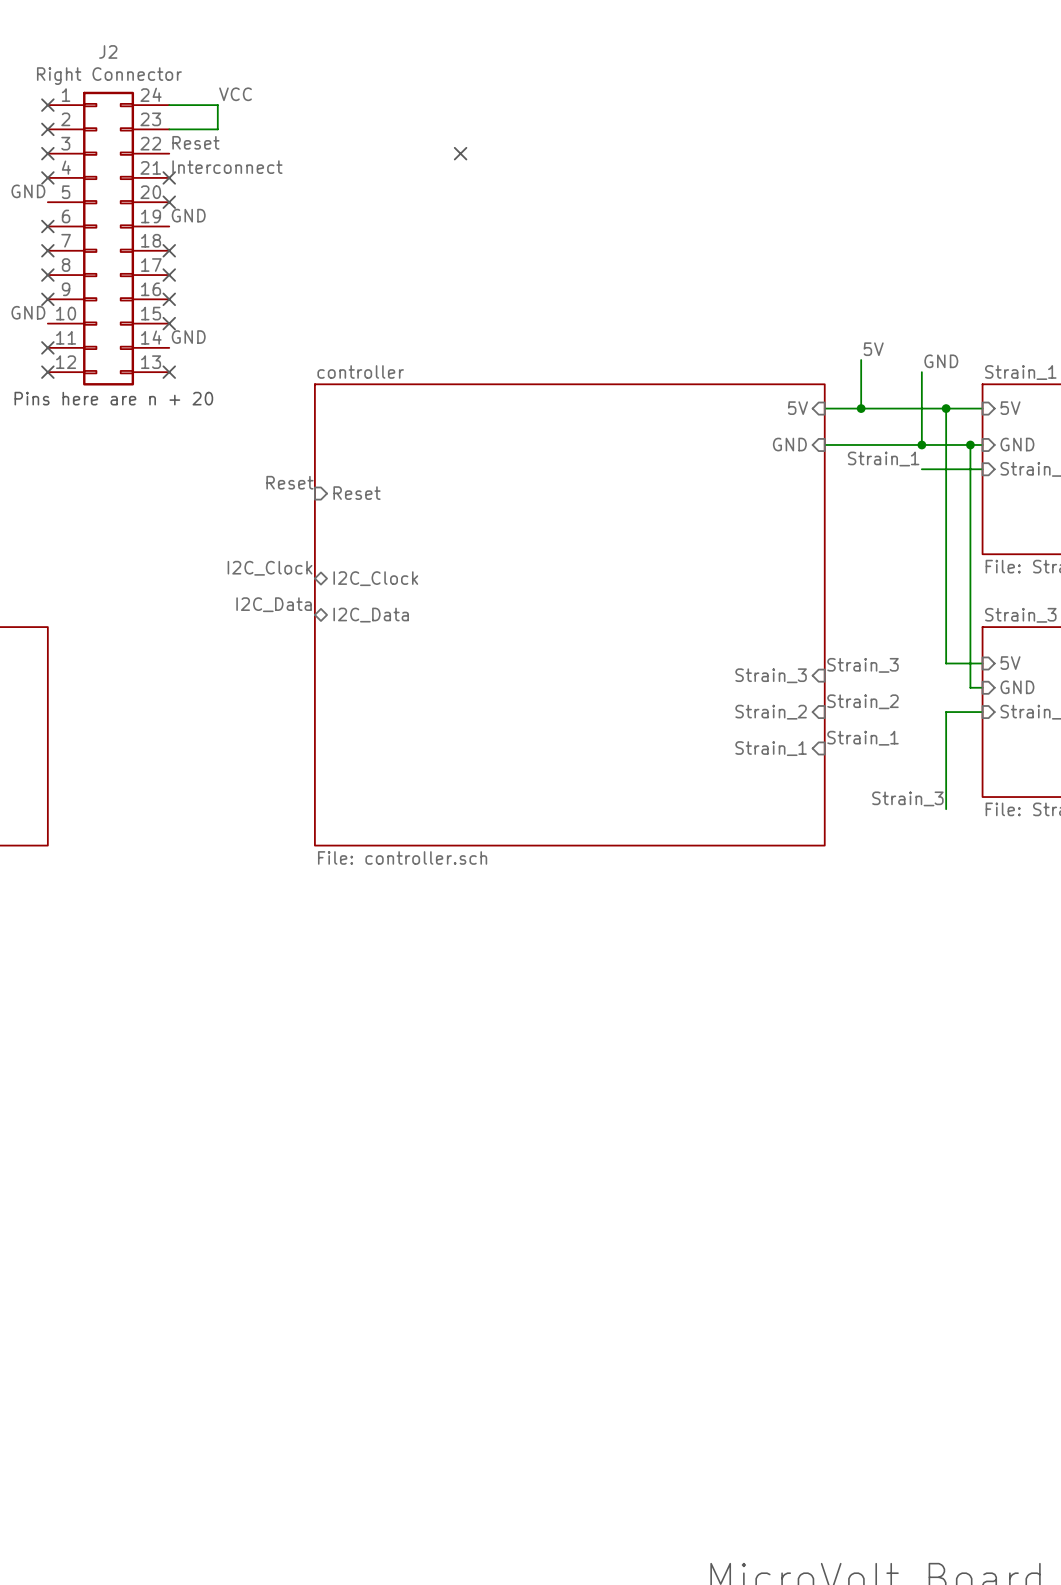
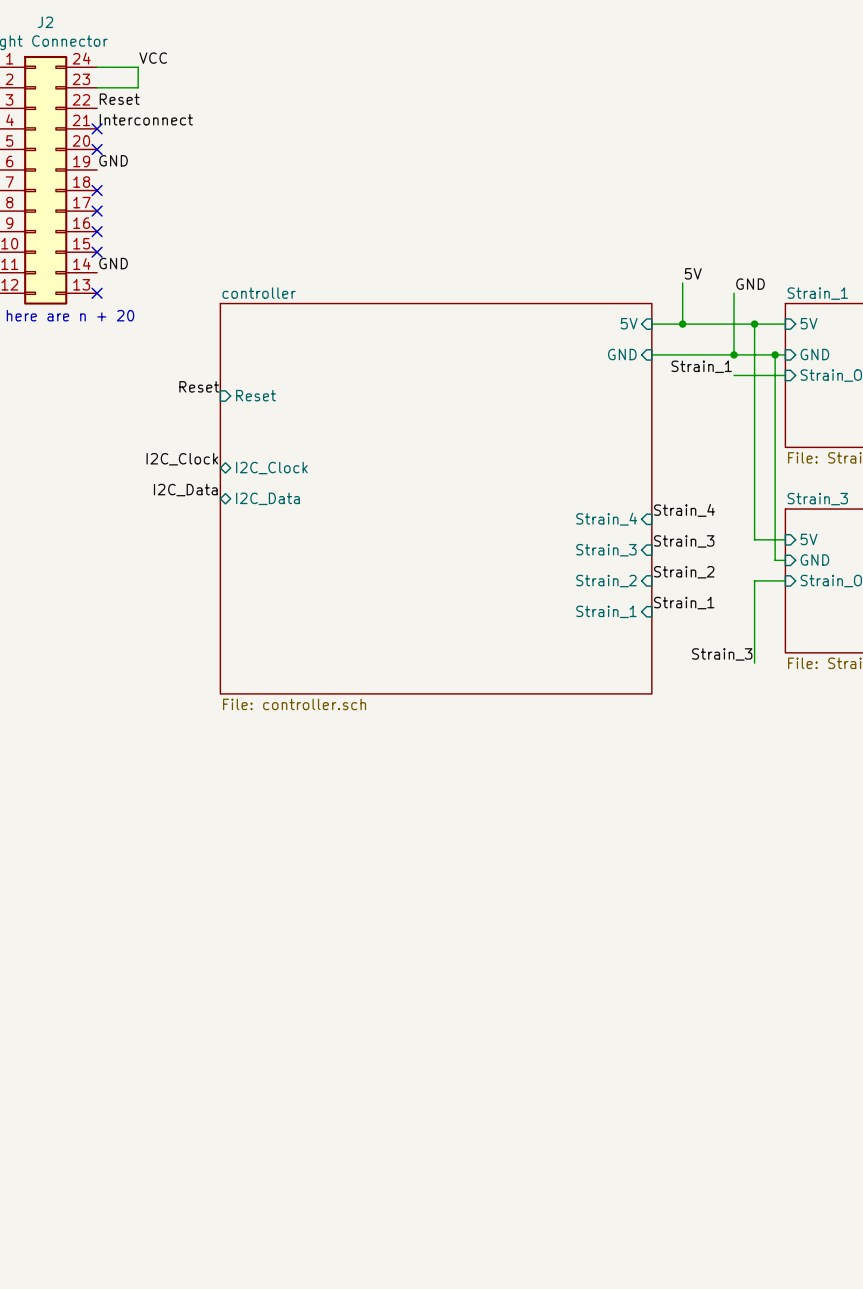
no-connect mark: (460, 153) -> none
label: none -> Strain_4 (684, 510)
sheet pin: none -> Strain_4 (606, 519)

